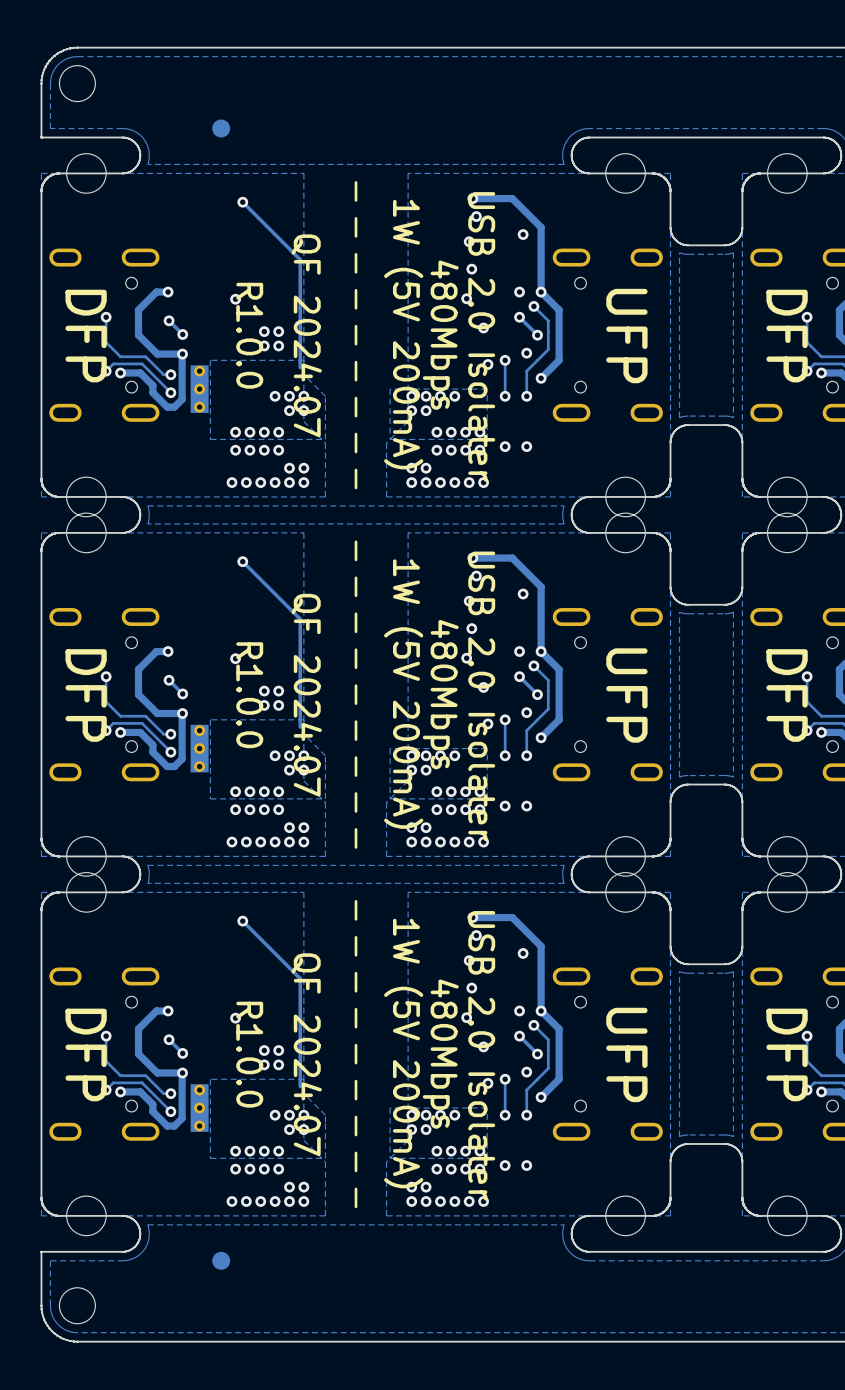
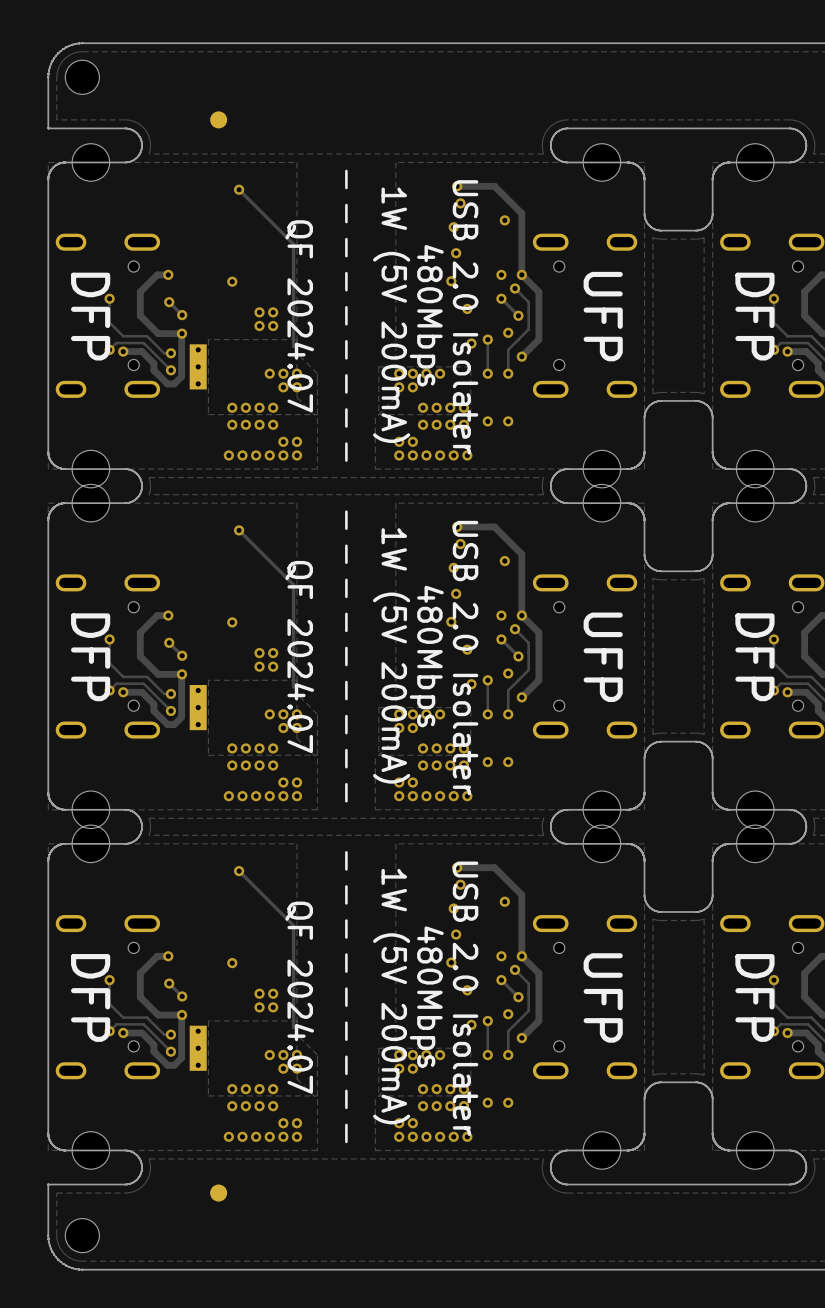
text: R1.0.0 (249, 335) -> none
text: R1.0.0 (249, 695) -> none
text: R1.0.0 (249, 1054) -> none

